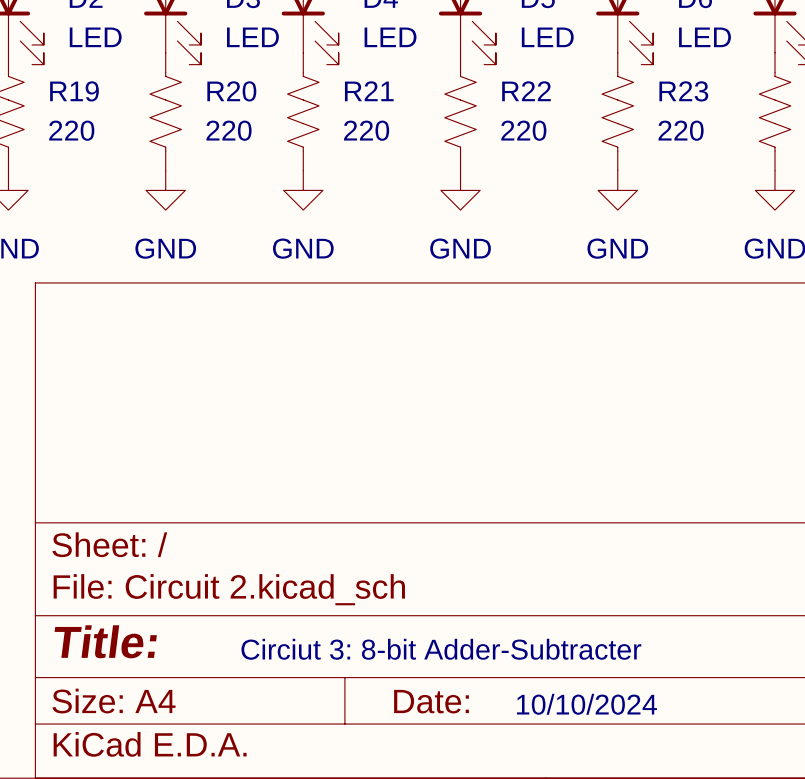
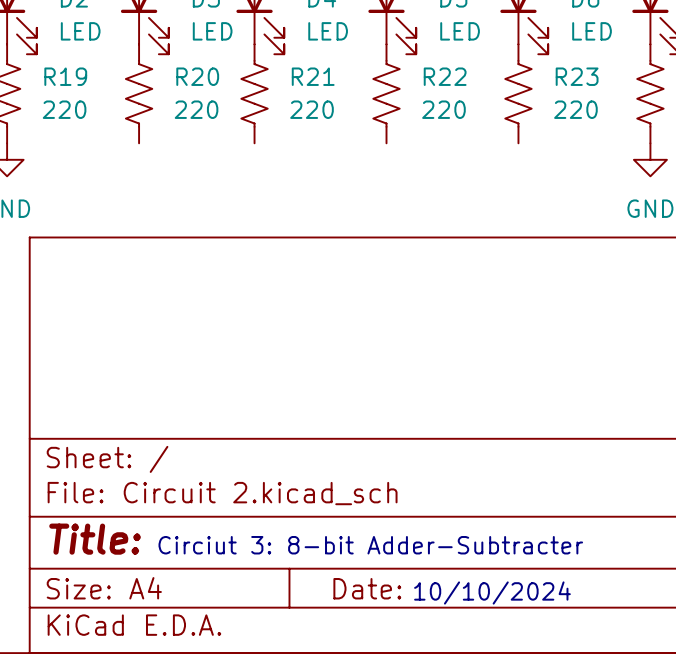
power symbol: GND (165, 190) -> none
power symbol: GND (303, 190) -> none
power symbol: GND (460, 190) -> none
power symbol: GND (617, 190) -> none

